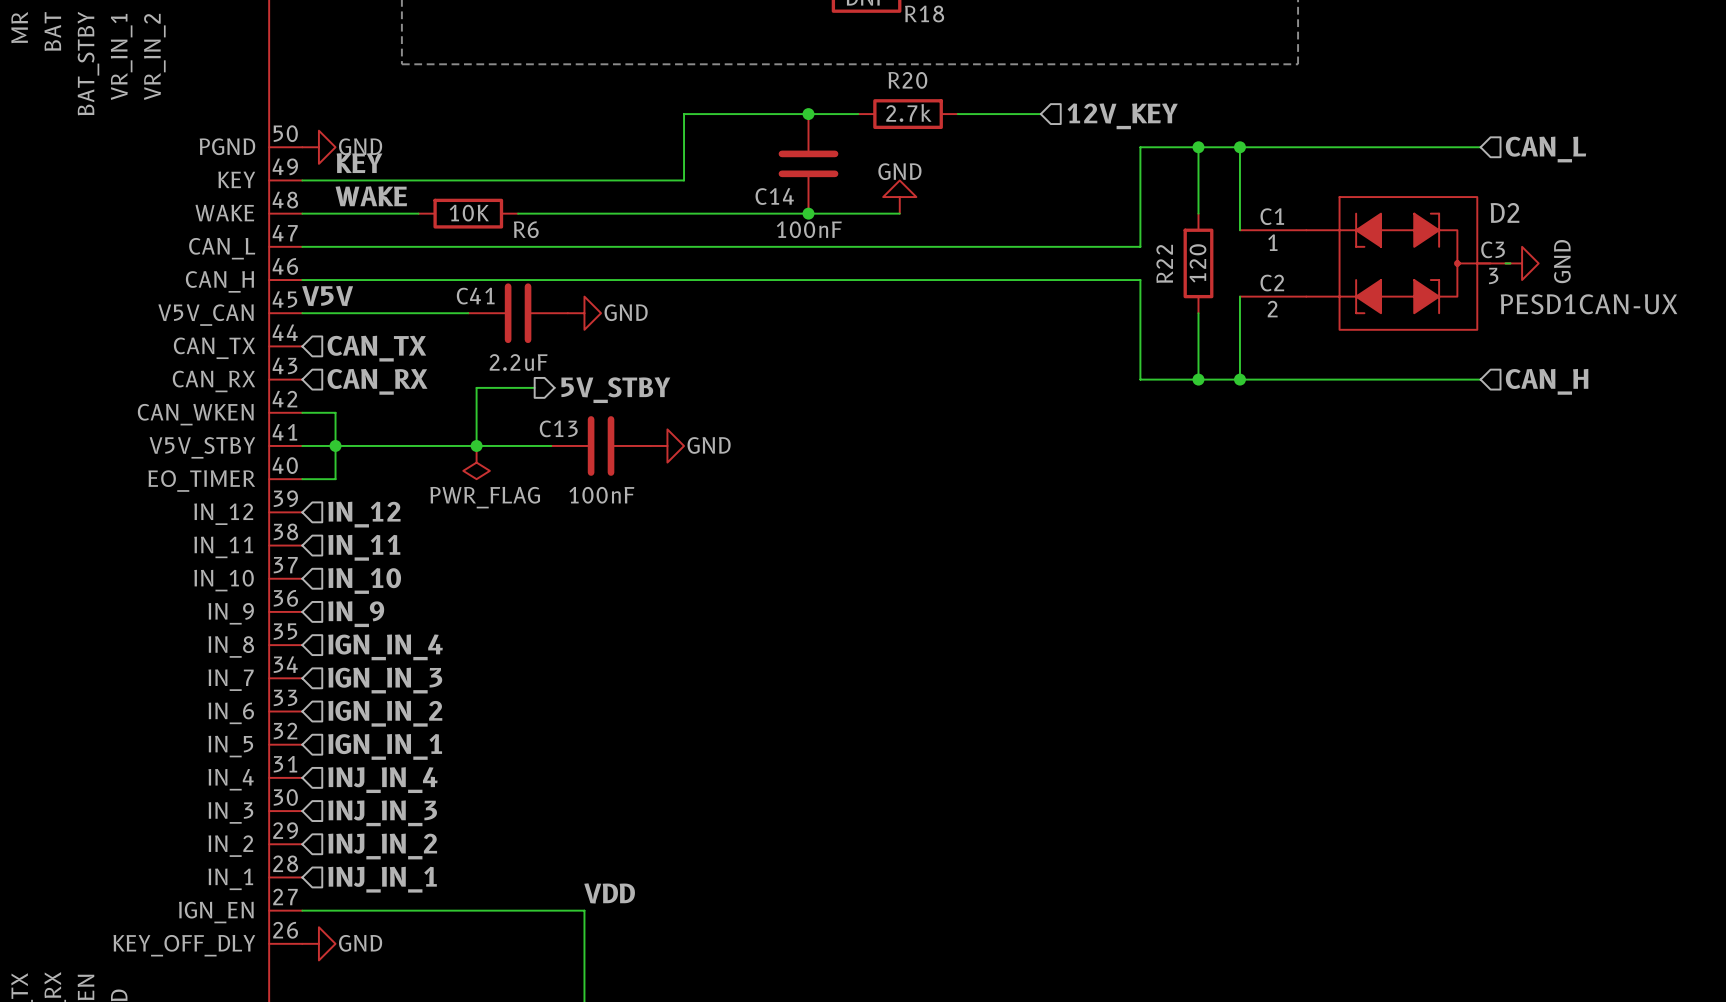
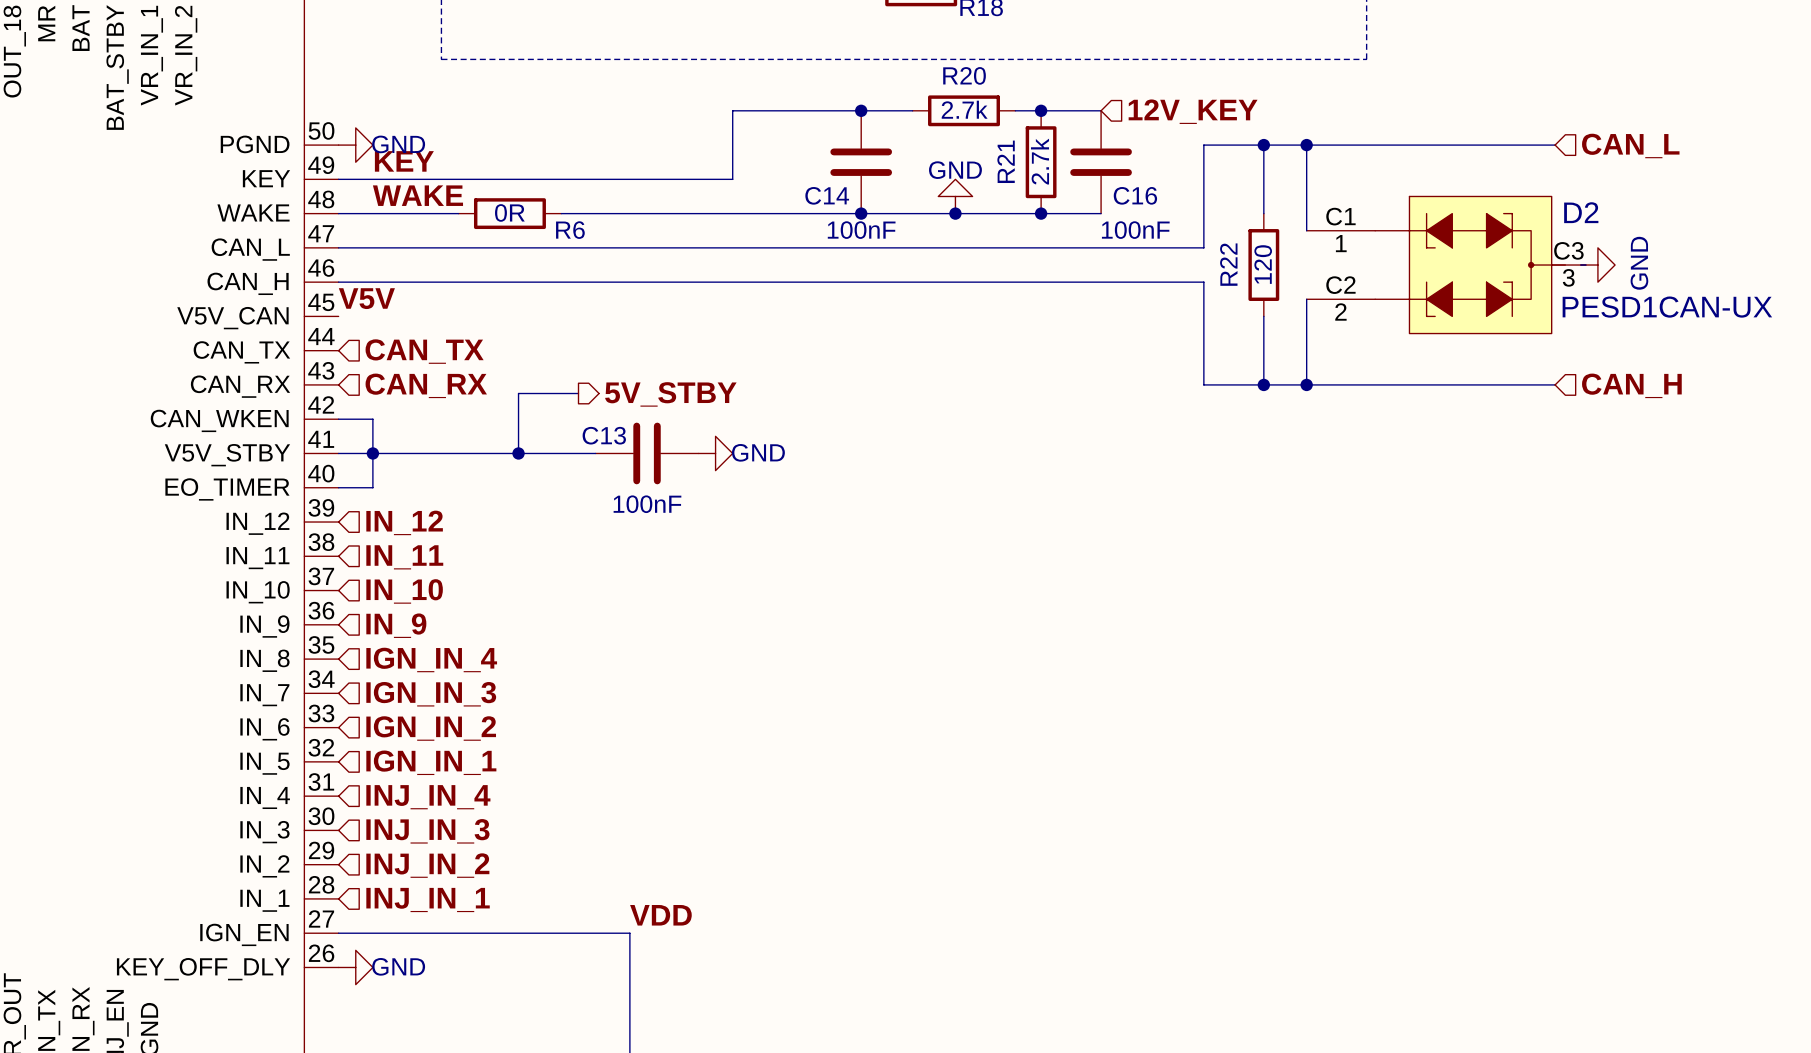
junction: none -> (1041, 110)
R21: none -> 2.7k (1041, 162)
C16: none -> 100nF (1101, 162)
R6 value: 10K (469, 213) -> 0R (509, 212)
wire: none -> (955, 213) (1101, 213)
junction: none -> (955, 213)
junction: none -> (1041, 213)
wire: (302, 313) (468, 313) -> none
C41: 2.2uF (518, 313) -> none
power symbol: GND (584, 313) -> none
power symbol: PWR_FLAG (476, 462) -> none

